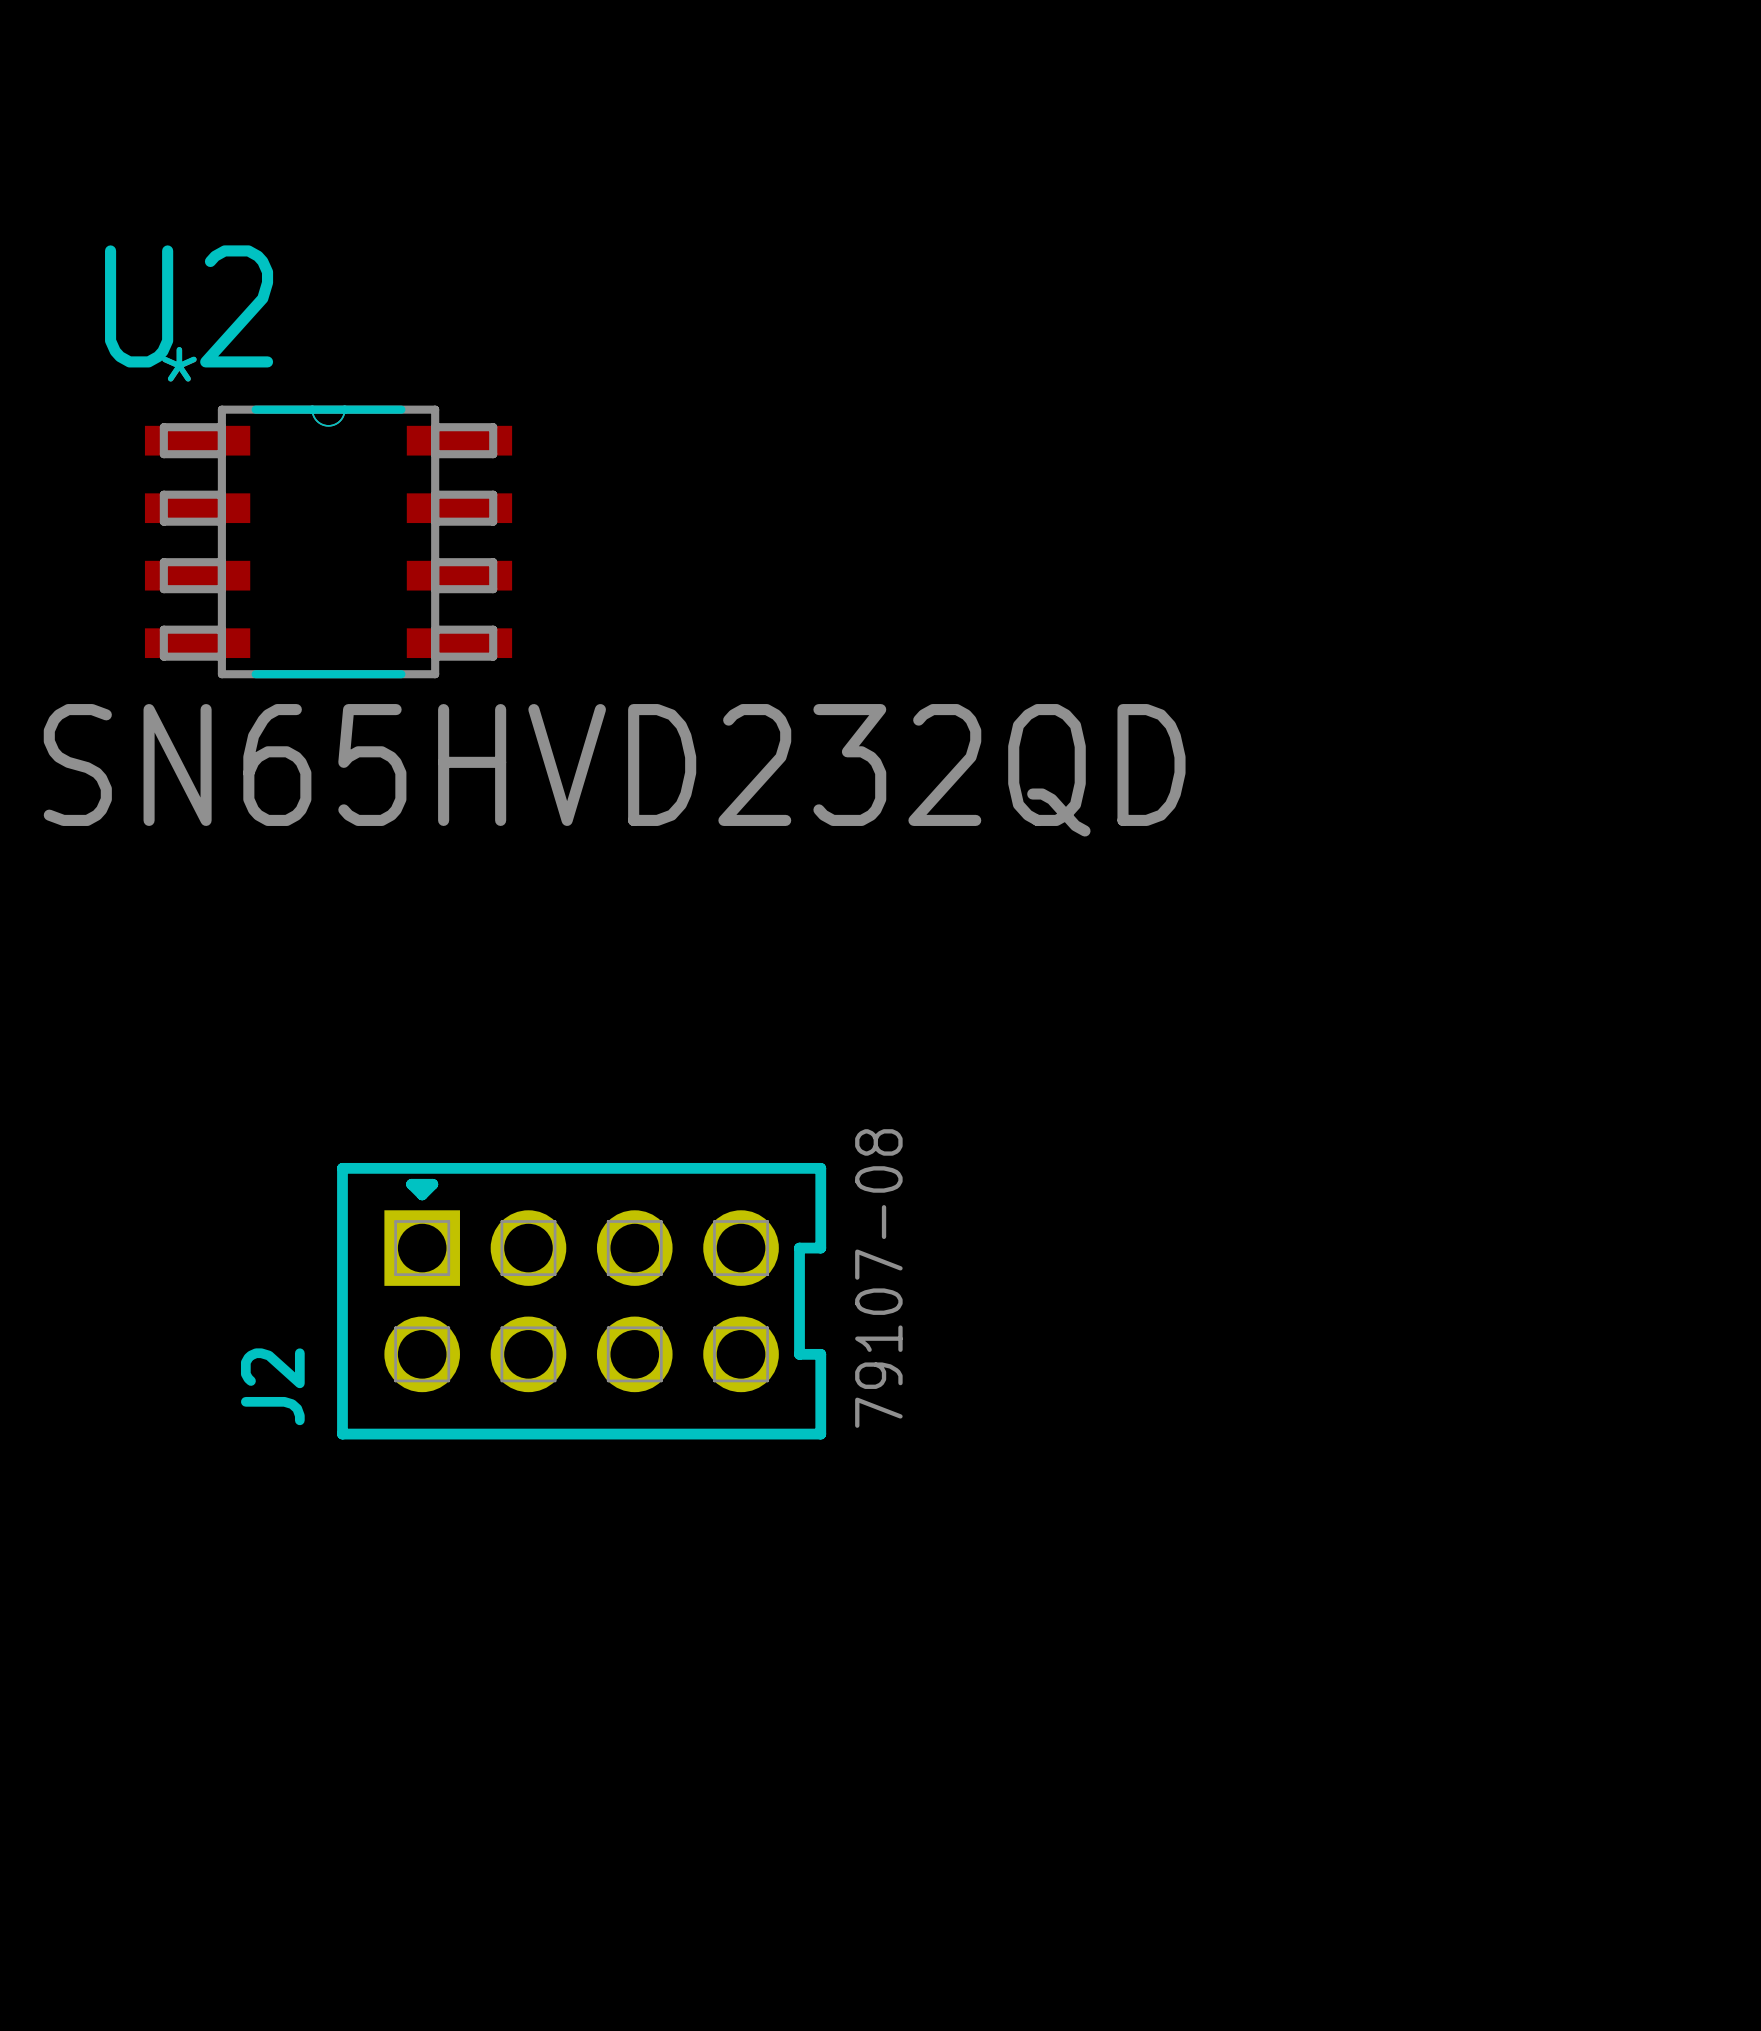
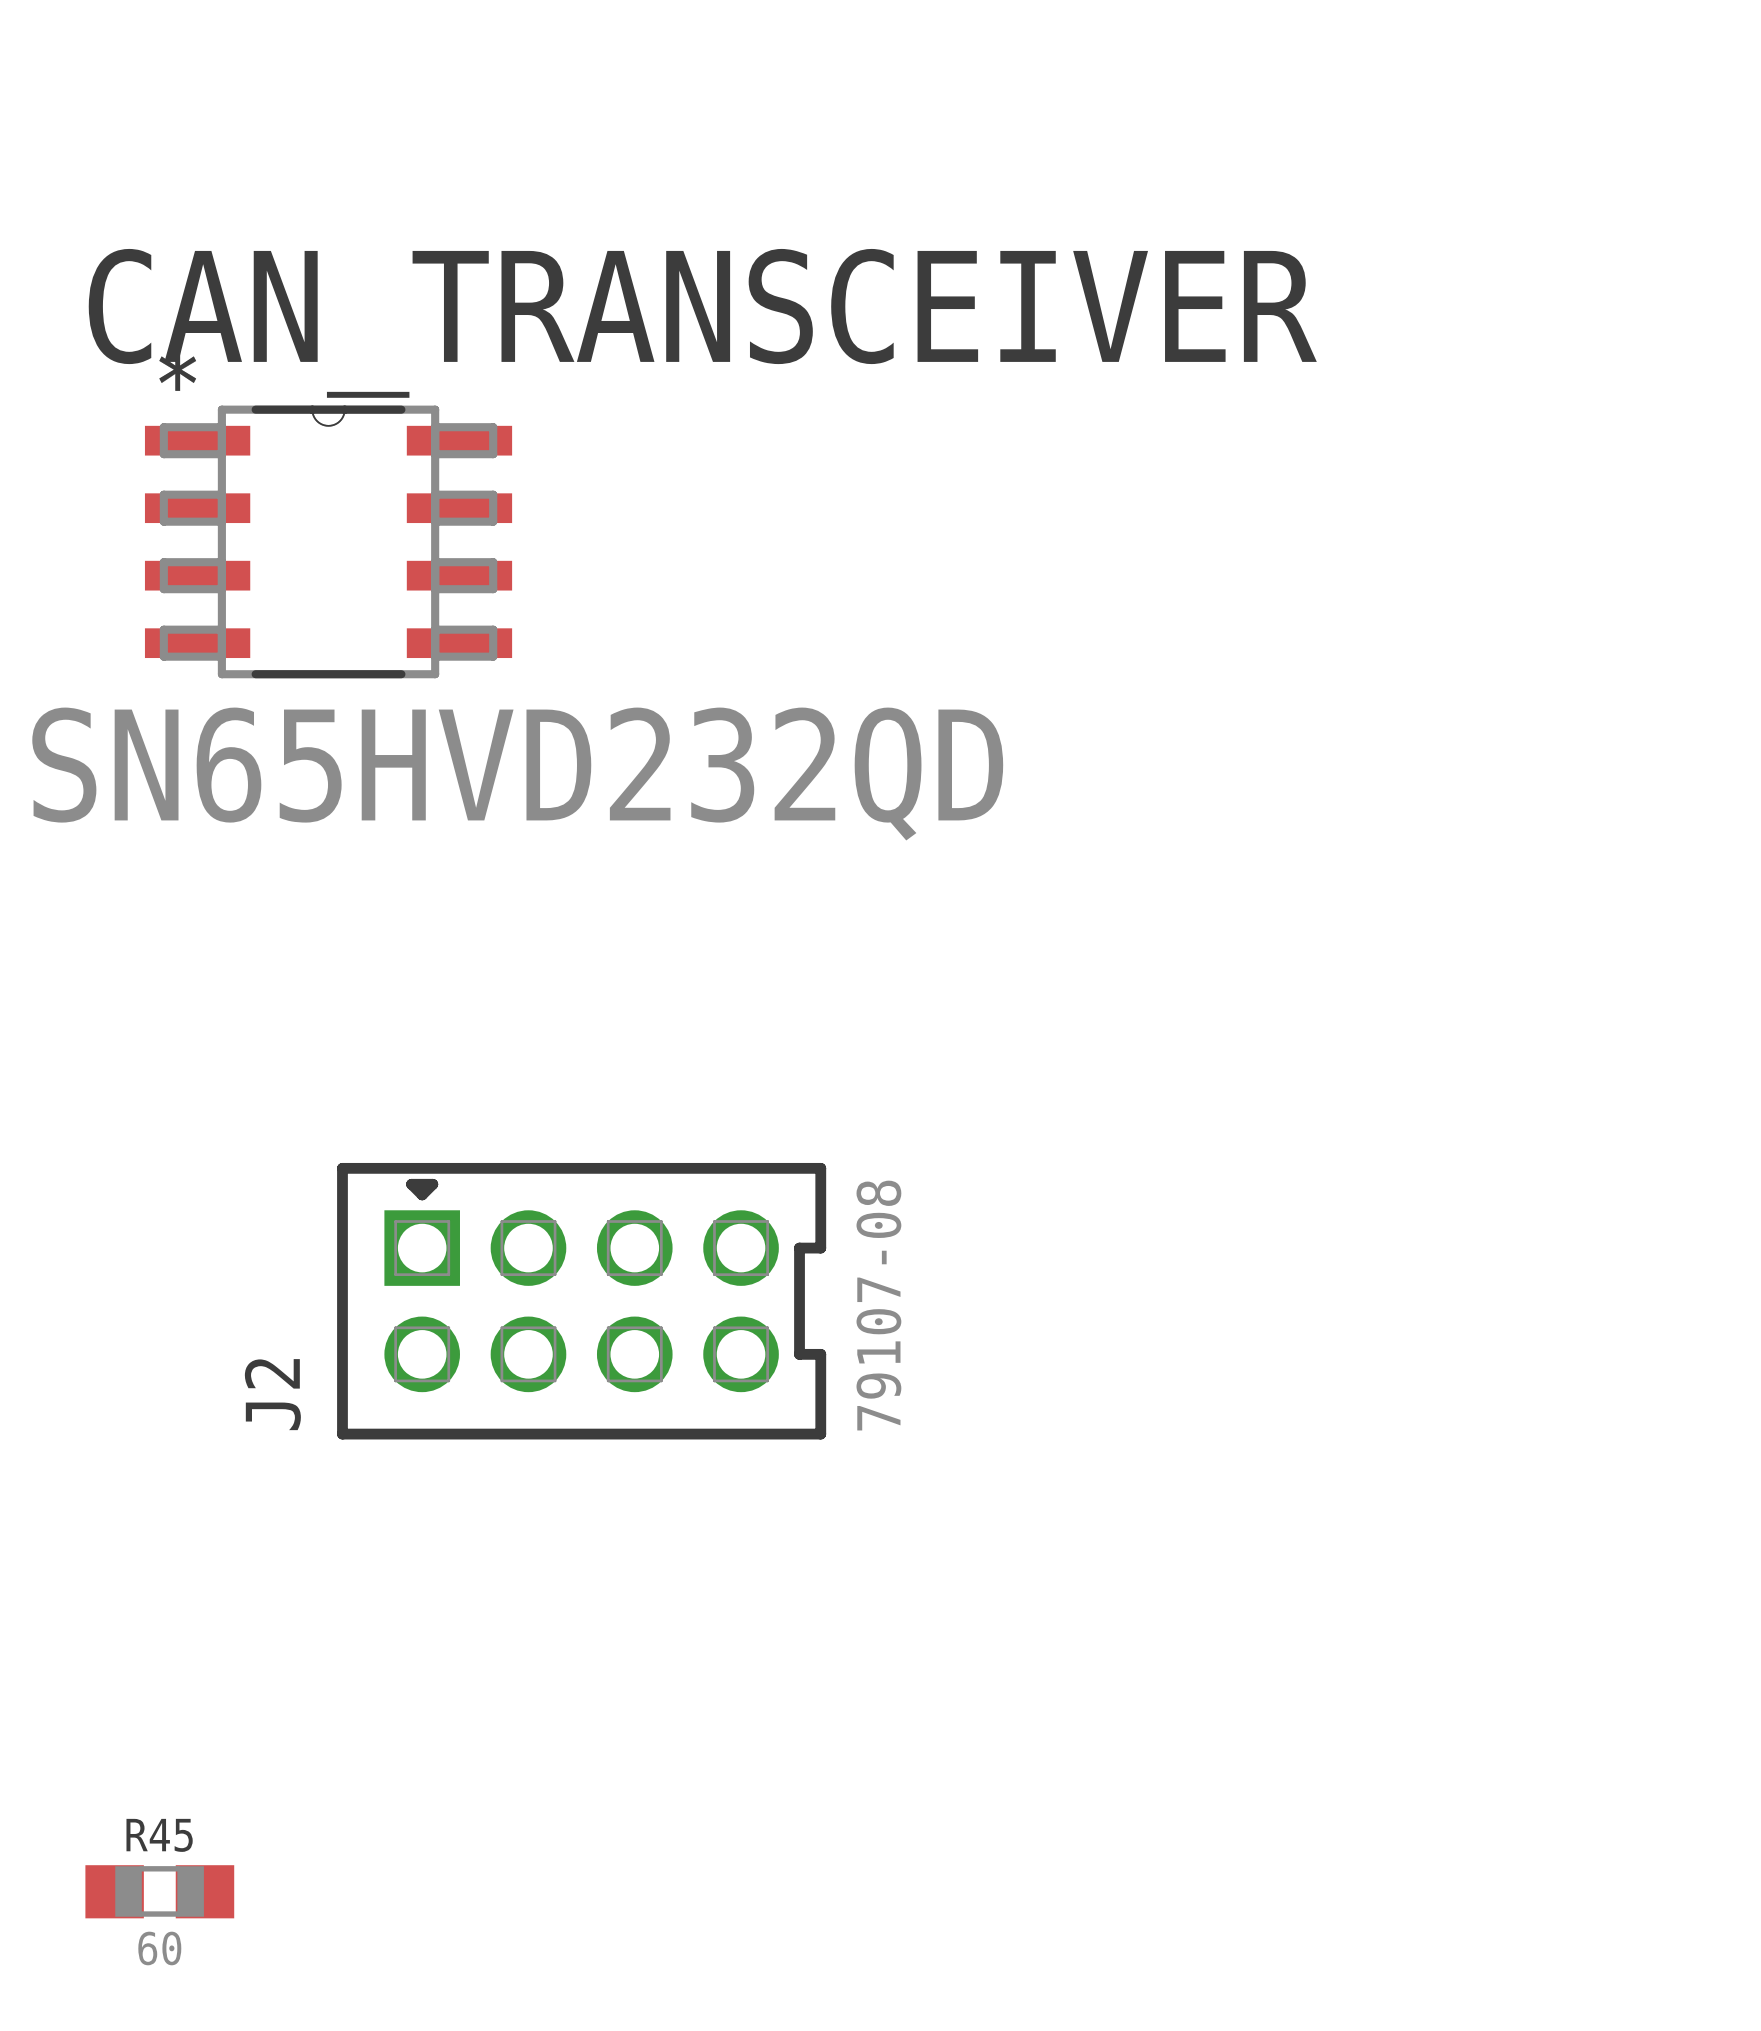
U2 name: U2 (189, 306) -> CAN_TRANSCEIVER (702, 323)
R45: none -> 60 (159, 1891)

